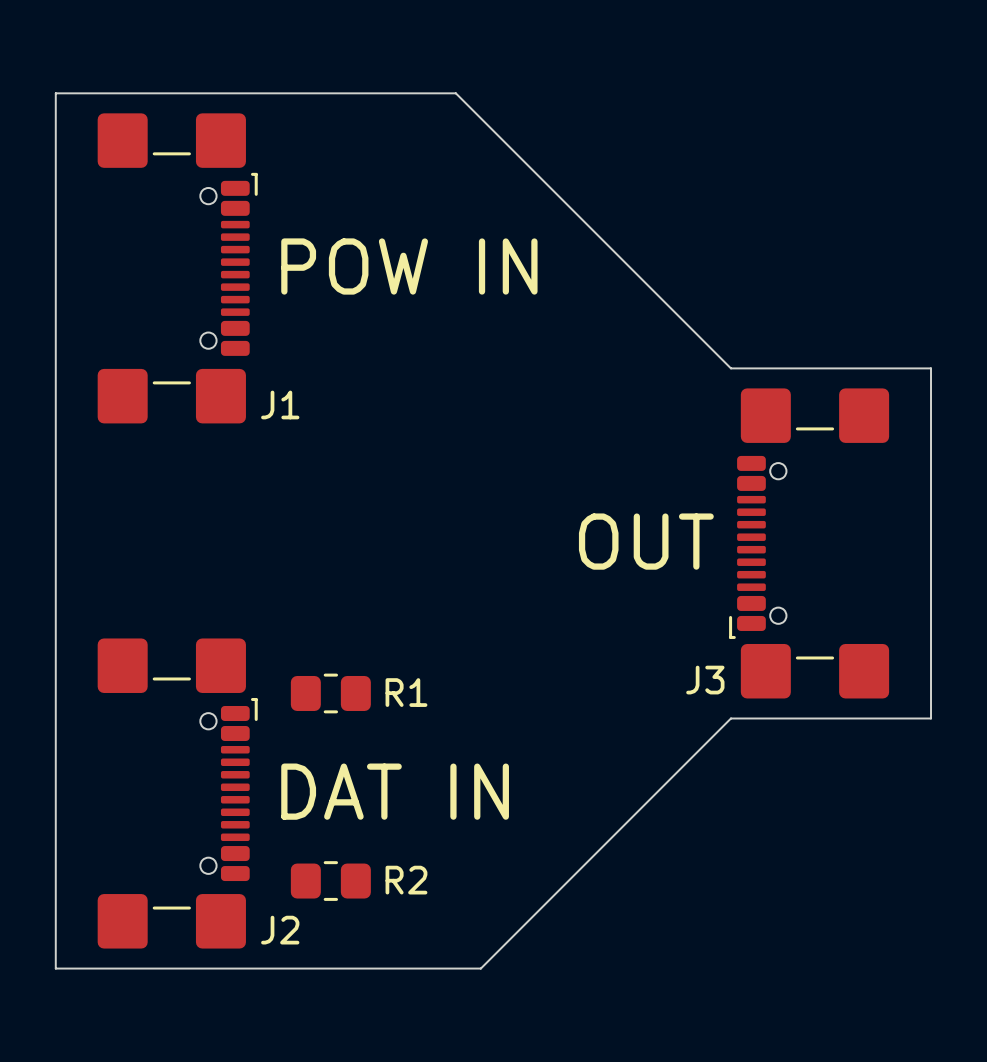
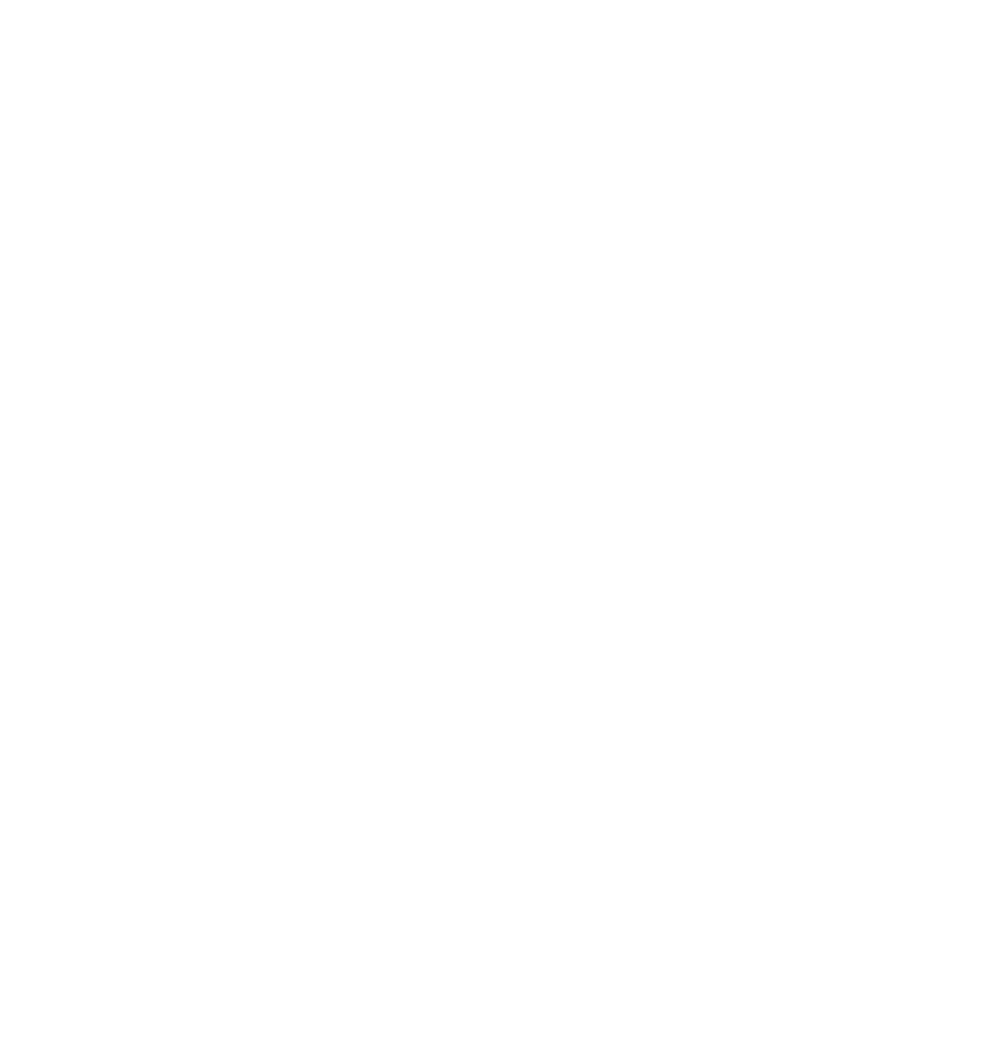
board edge: (55, 93) (55, 968) (480, 968) (730, 718) (931, 718) (931, 368) (730, 368) (455, 93) (55, 93) -> none
text: POW IN (409, 266) -> none
J1: (177, 268) -> none
text: OUT (646, 541) -> none
J3: (809, 543) -> none
R1: (330, 693) -> none
text: DAT IN (395, 791) -> none
J2: (177, 793) -> none
R2: (330, 881) -> none

